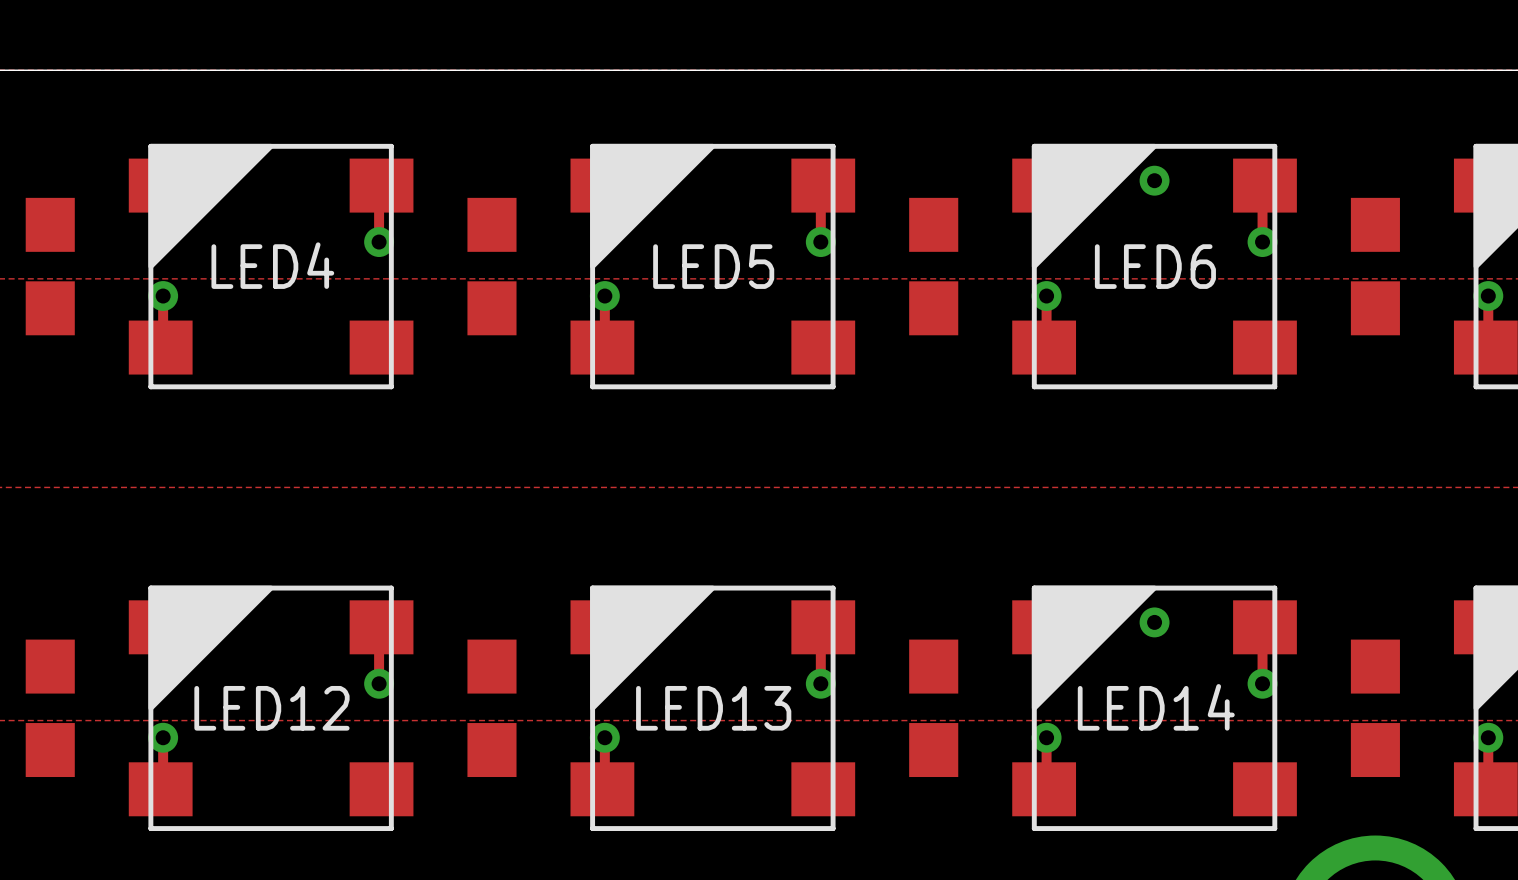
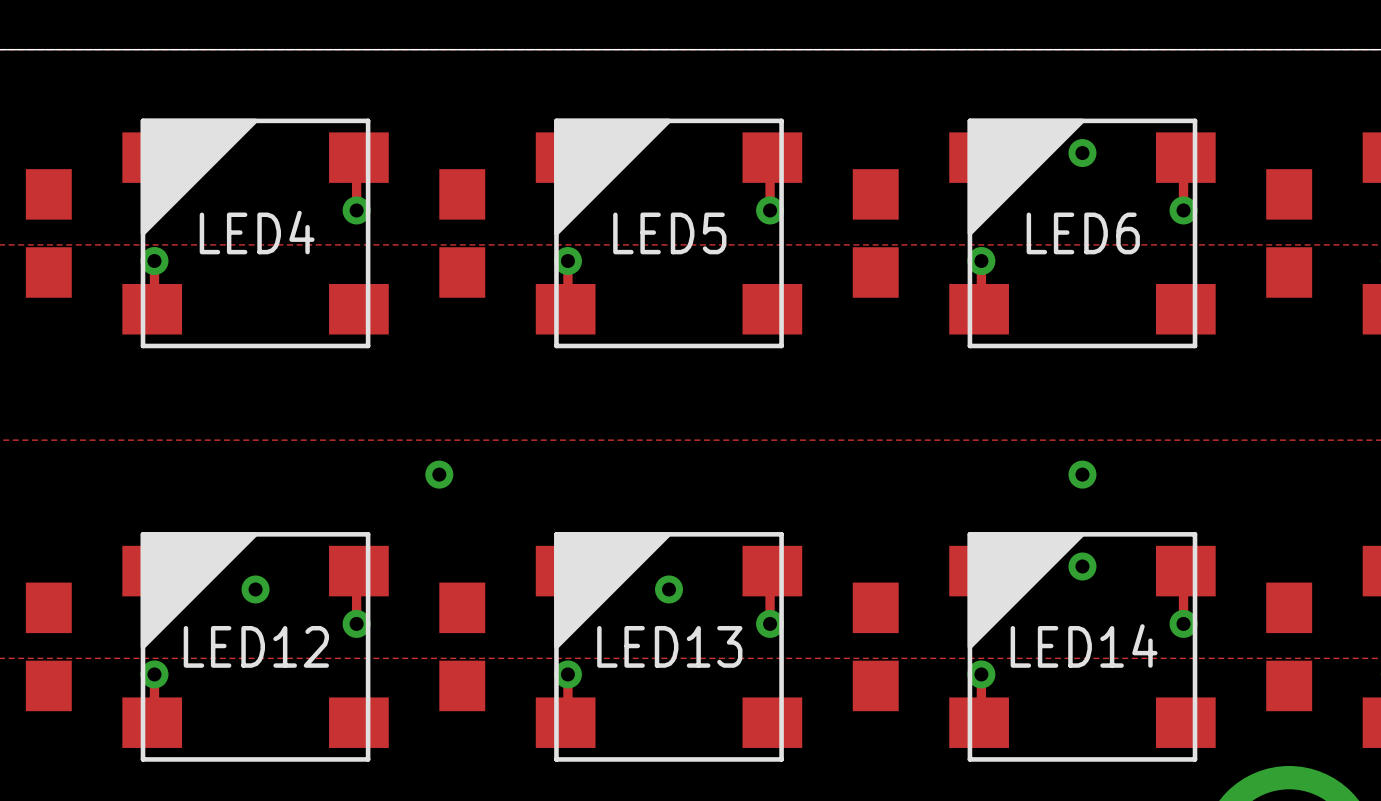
via: none -> (439, 474)
via: none -> (1082, 474)
via: none -> (255, 589)
via: none -> (669, 589)

